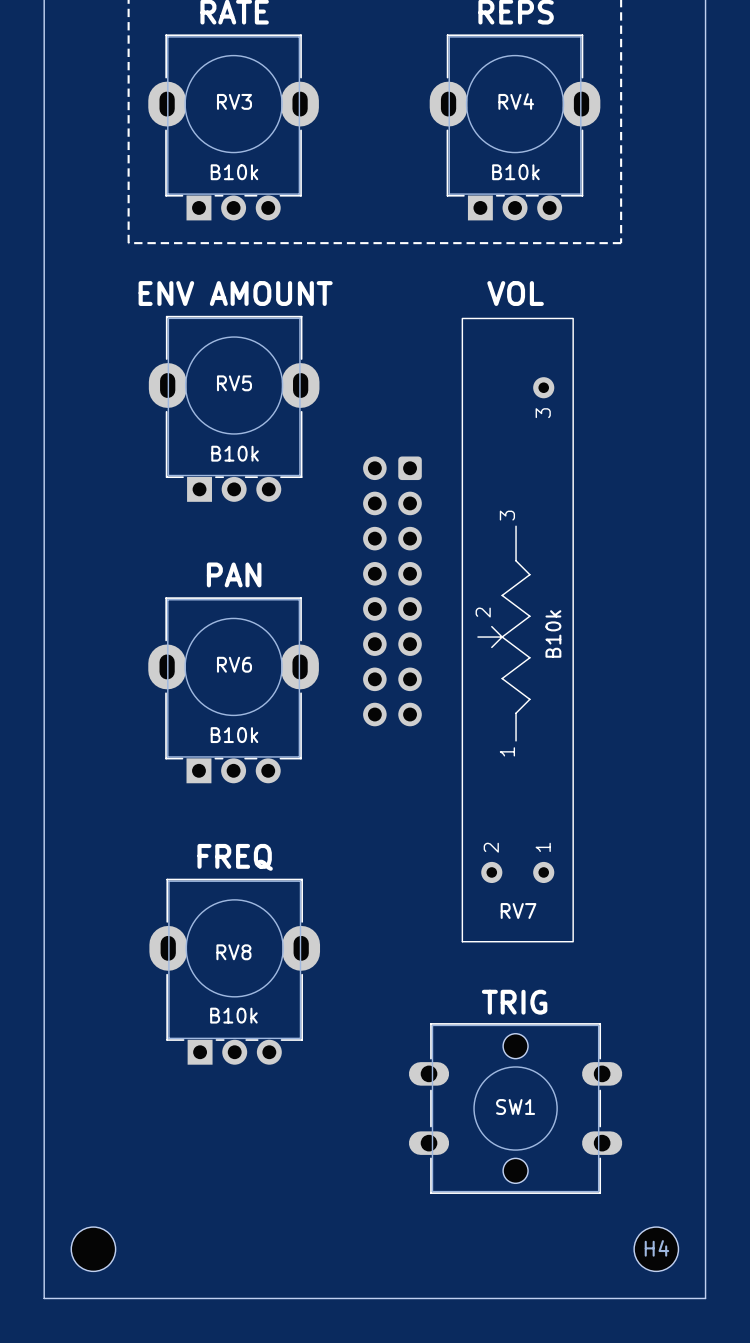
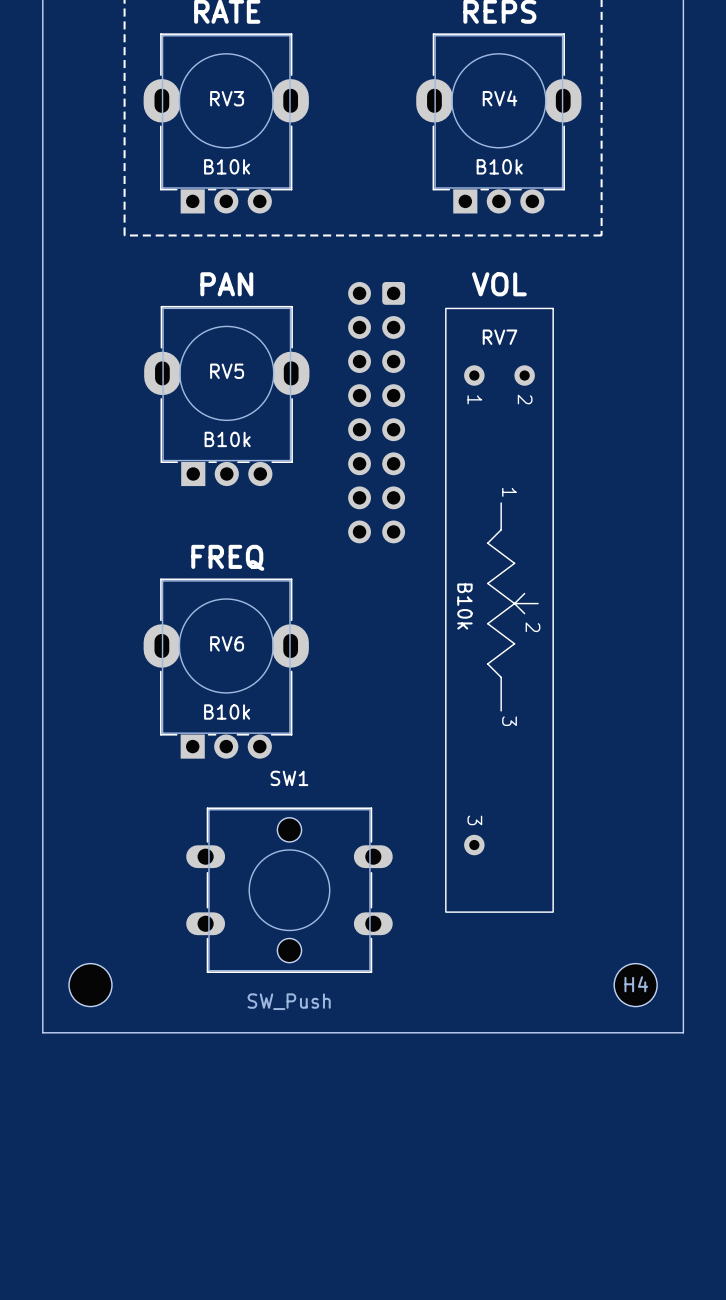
text: ENV AMOUNT (235, 293) -> PAN (226, 284)
text: PAN (234, 574) -> FREQ (227, 557)
part position: (392, 591) -> (376, 412)
RV7 rotation: 0° (517, 630) -> 180° (499, 610)
text: FREQ (235, 857) -> none
RV8: B10k (234, 971) -> none
SW1 value: TRIG (514, 1002) -> SW_Push (289, 1001)
board edge: (44, 1066) (44, 1298) (705, 1298) (705, 1066) -> (42, 1032) (683, 1032)
SW1 name position: SW1 (515, 1107) -> SW1 (289, 778)
SW1 position: (515, 1108) -> (289, 890)
part position: (93, 1249) -> (90, 985)
H4 position: (656, 1249) -> (635, 985)

